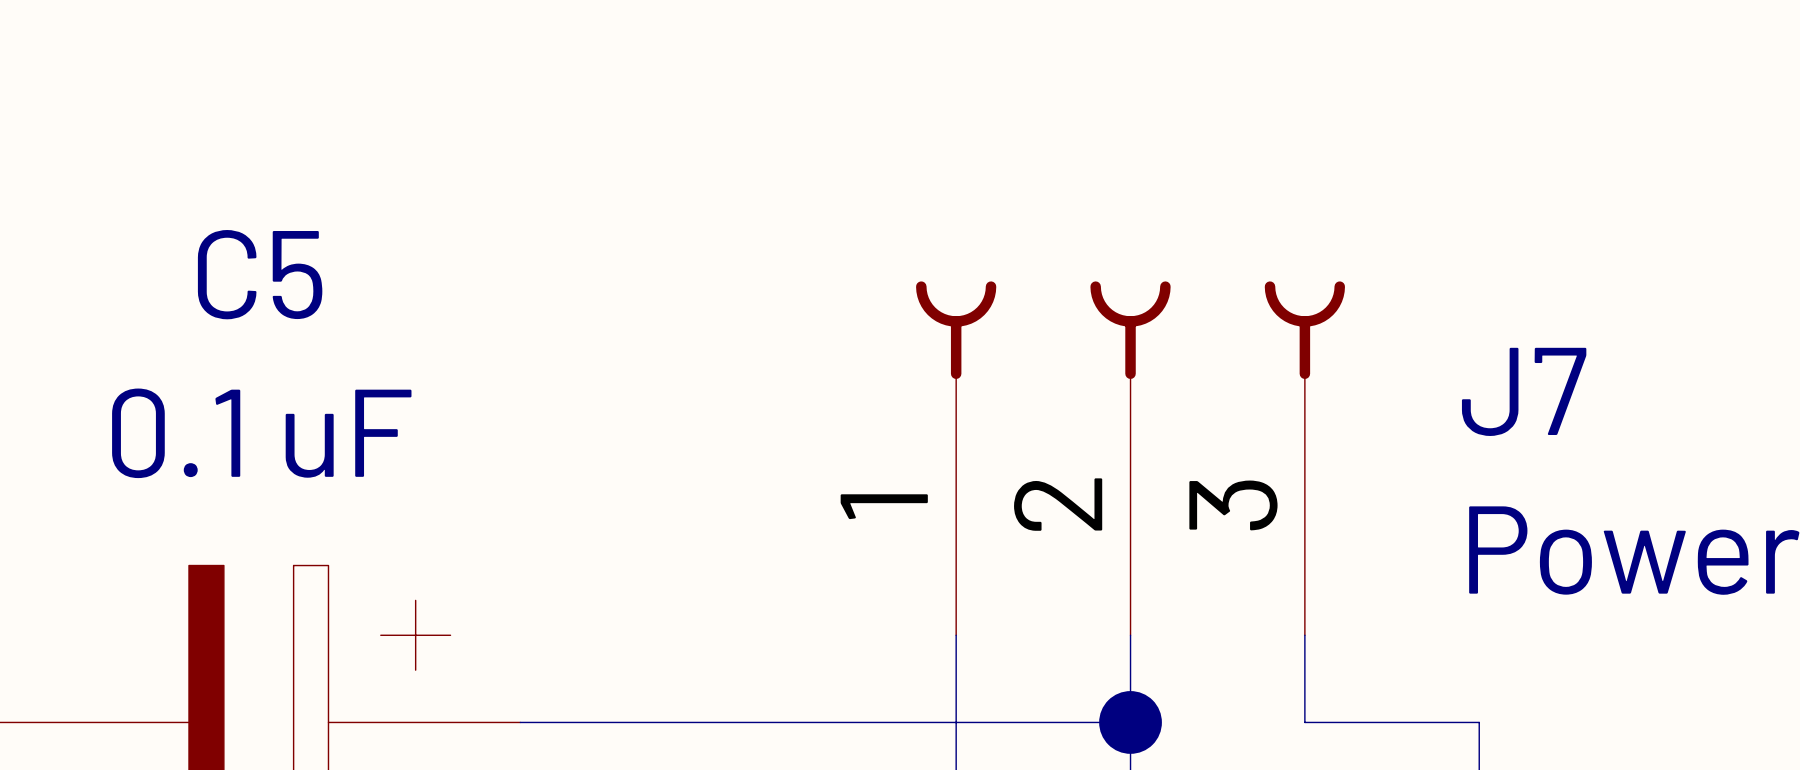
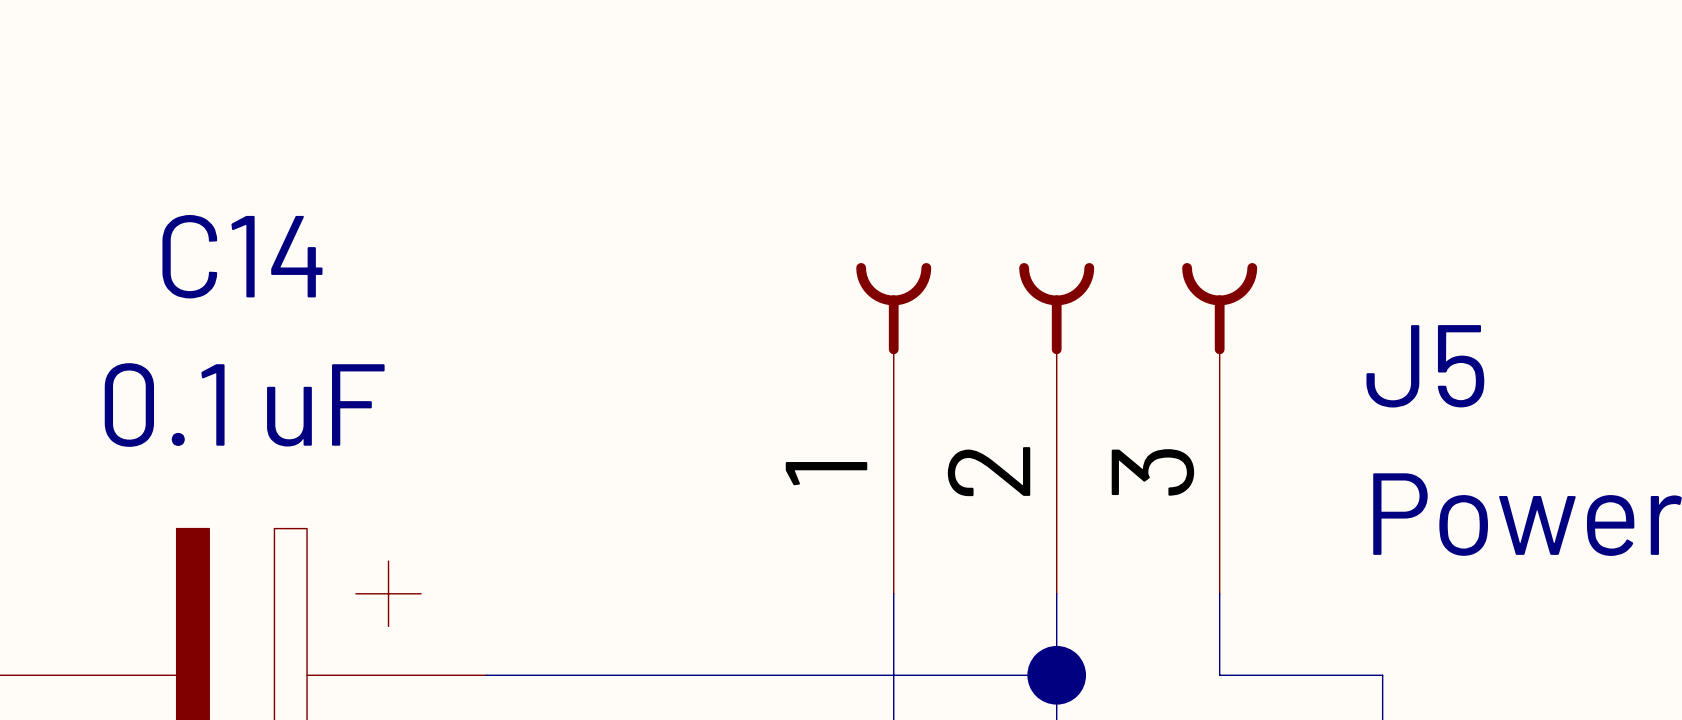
C5 name: C5 (260, 274) -> C14 (242, 256)
J7 name: J7 (1524, 391) -> J5 (1425, 366)

